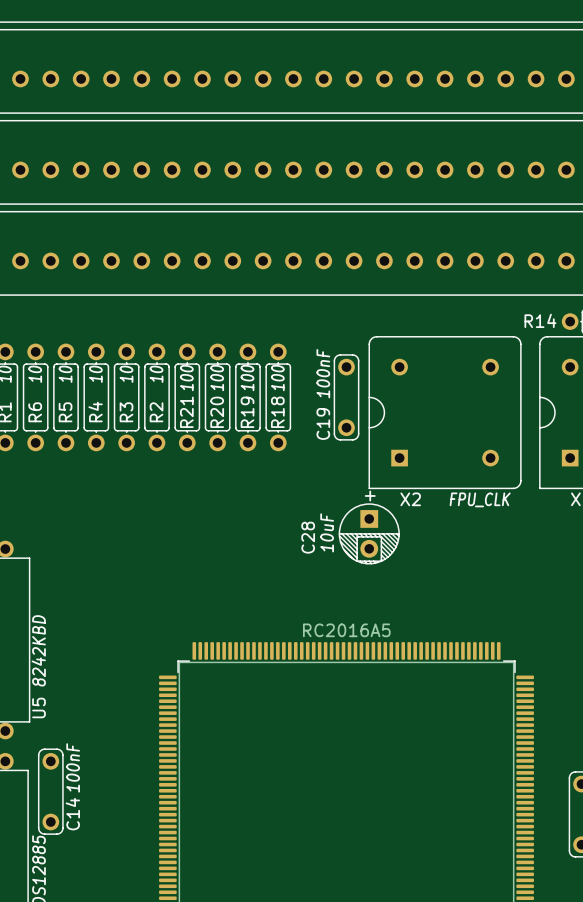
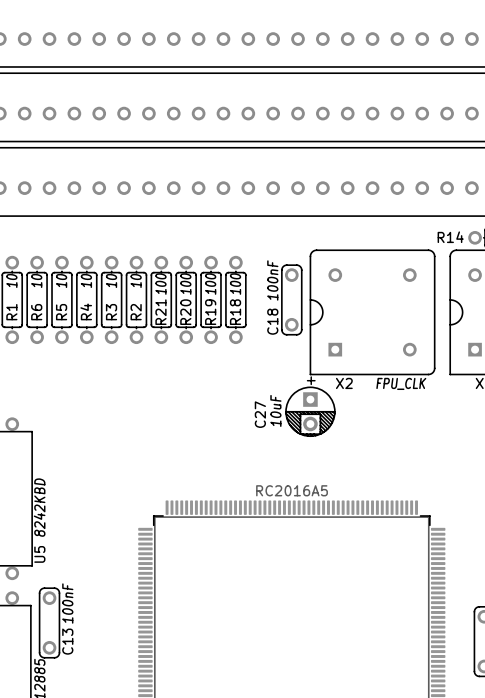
C19 name: C19 (323, 423) -> C18 (272, 321)
C28 name: C28 (308, 537) -> C27 (260, 414)
C14 name: C14 (72, 814) -> C13 (67, 641)

